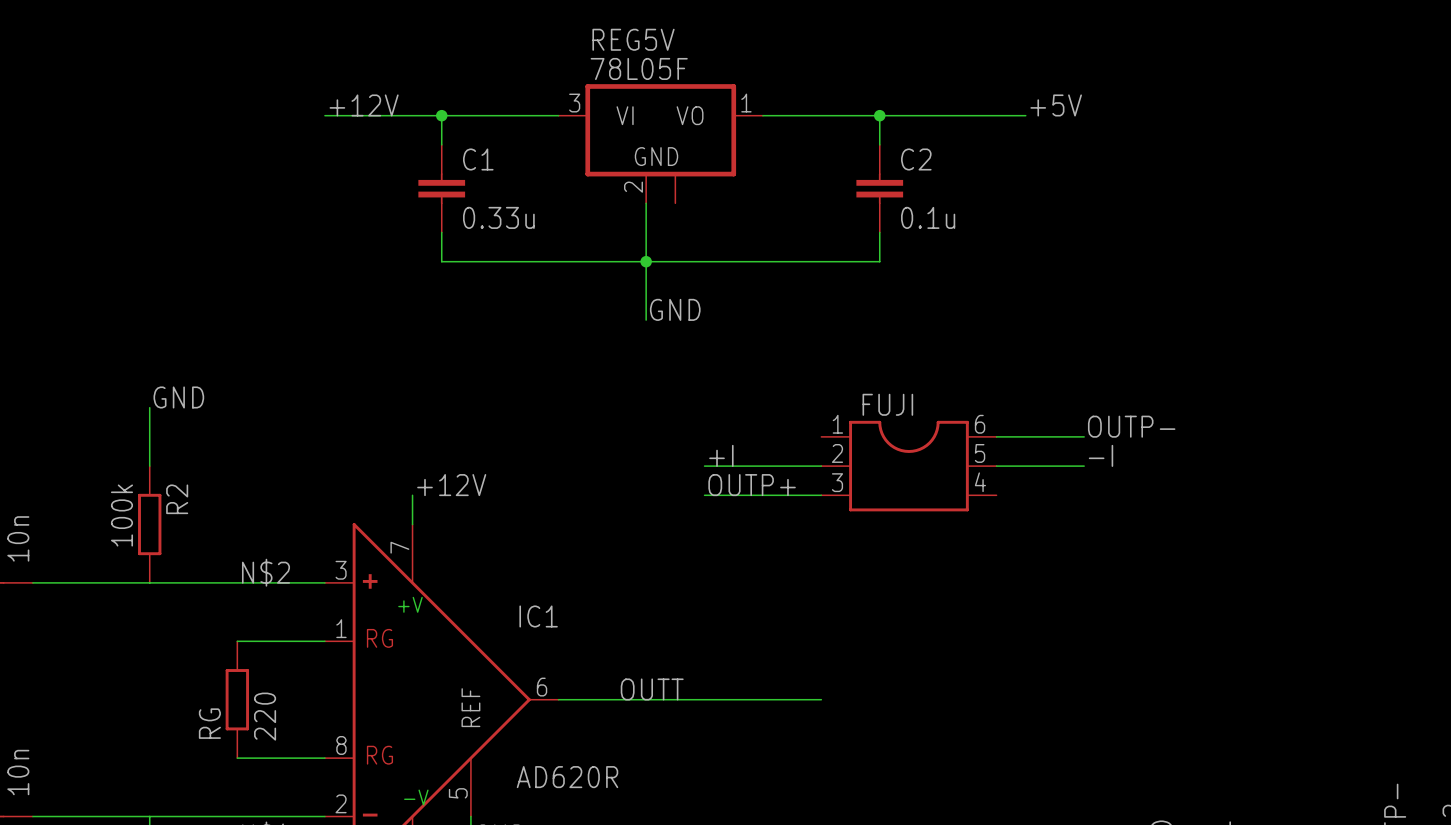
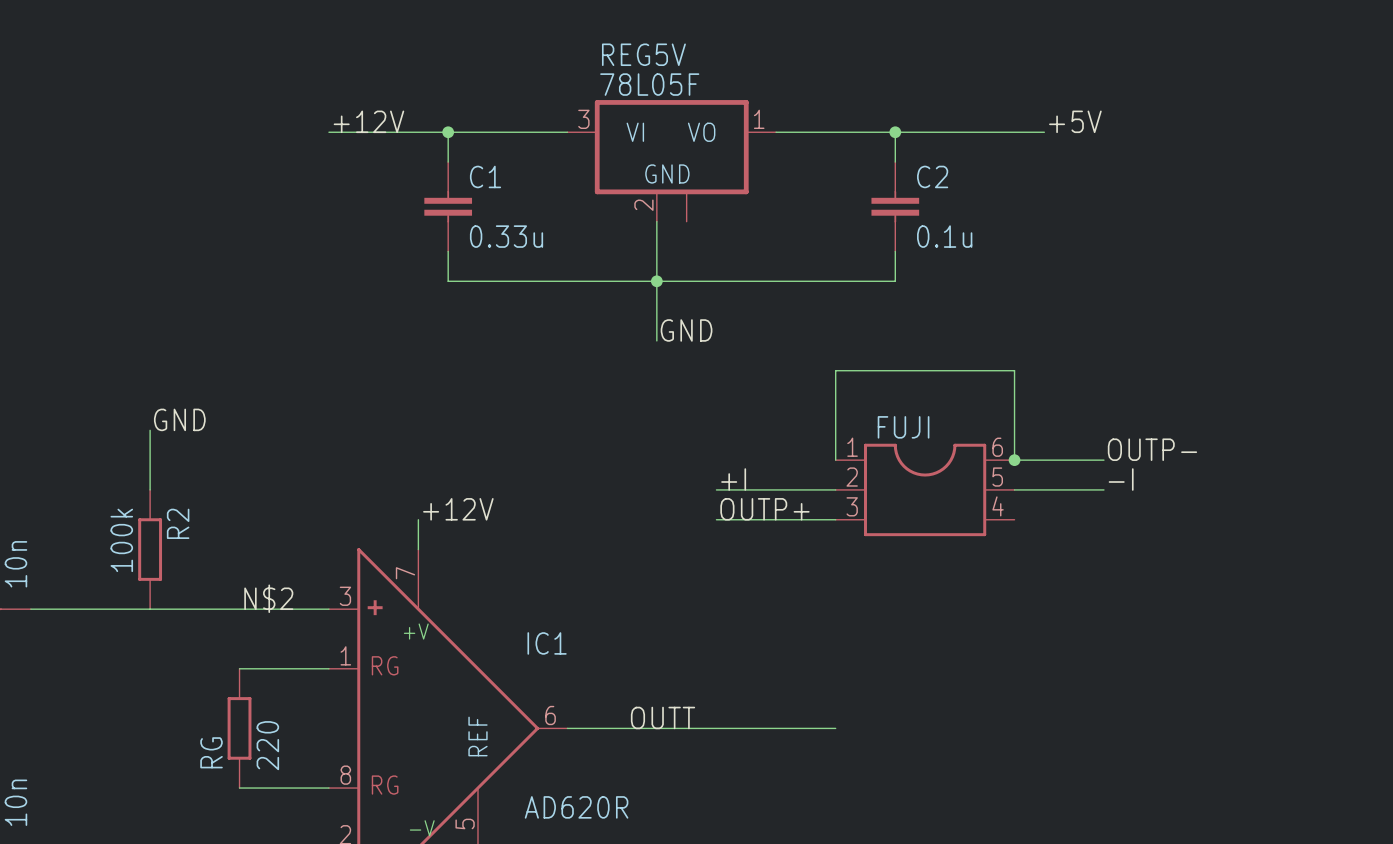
wire: none -> (835, 460) (835, 370) (1014, 370) (1014, 460)
junction: none -> (1014, 460)

